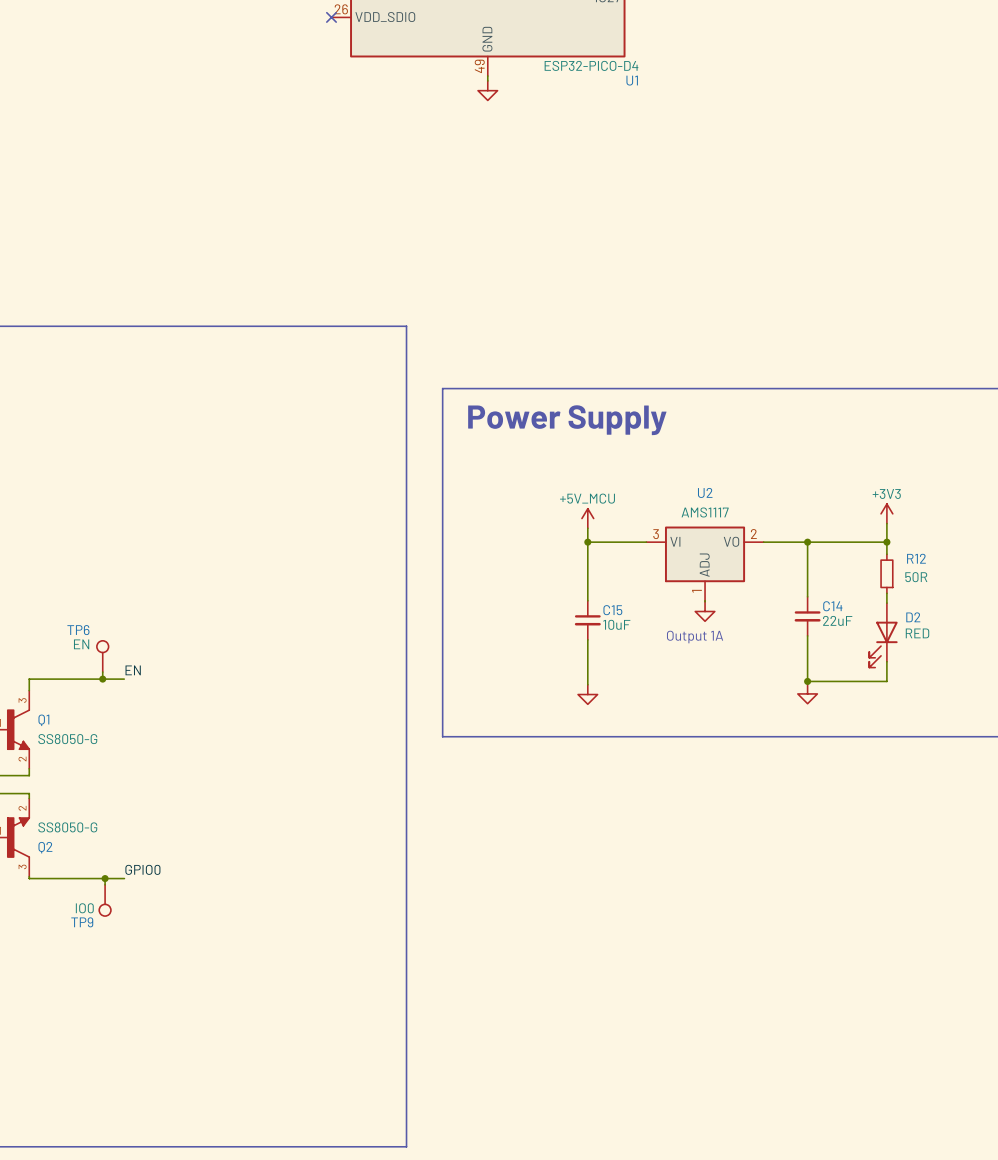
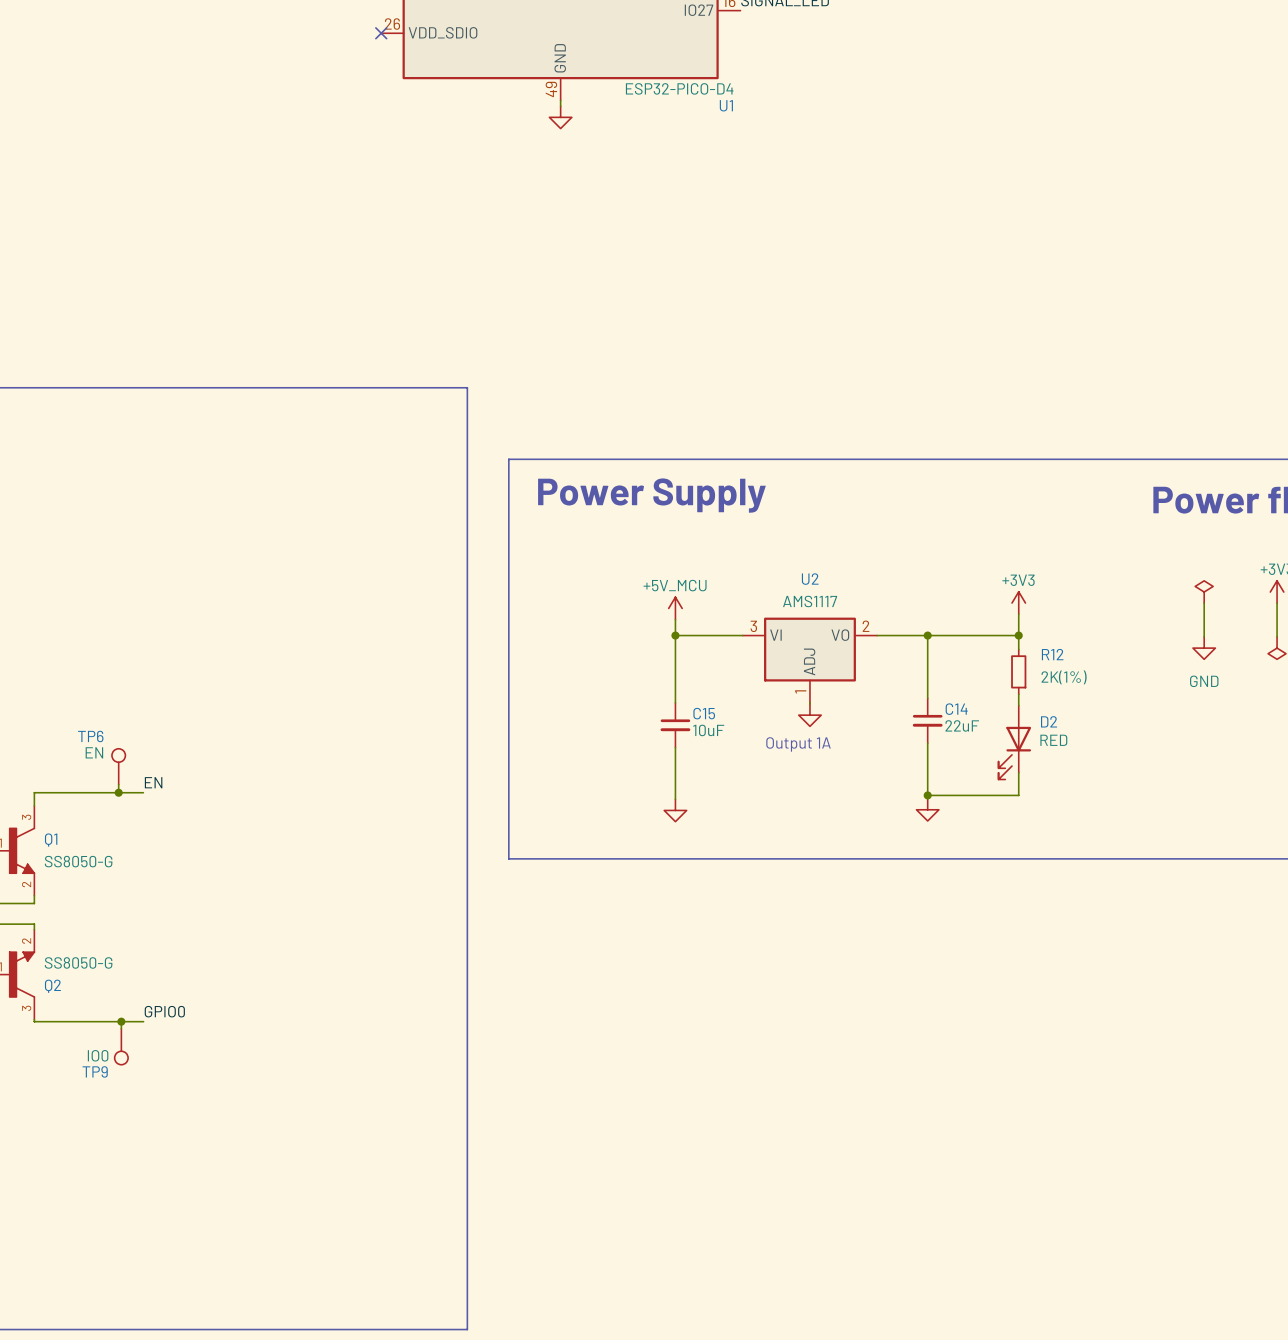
R12 value: 50R (916, 577) -> 2K(1%) (1064, 677)

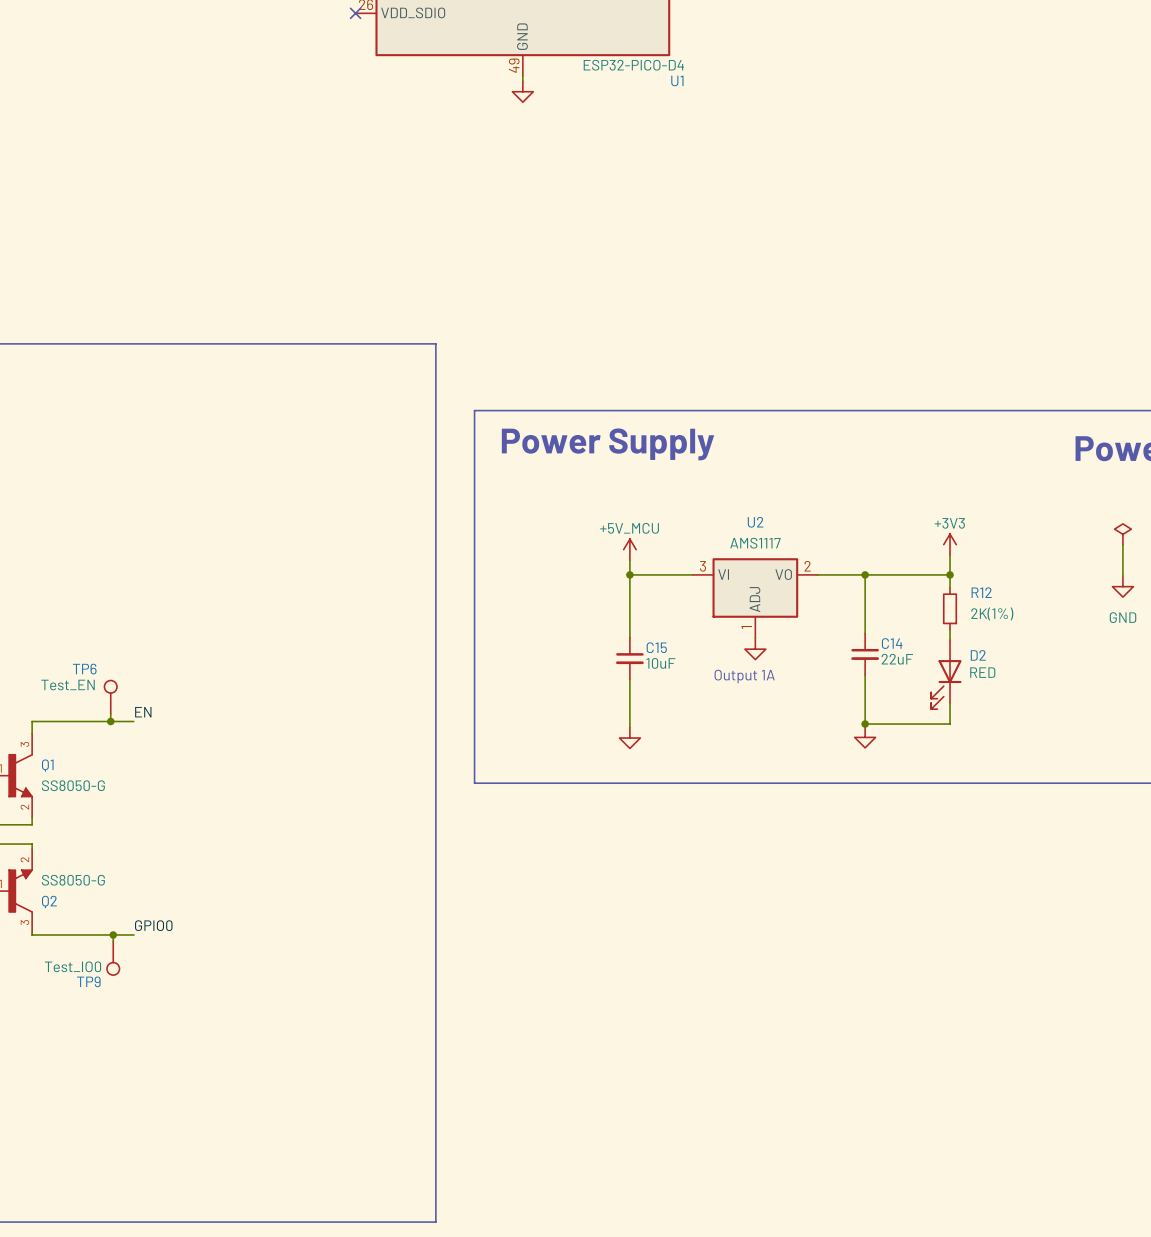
TP6 value: EN (94, 752) -> Test_EN (68, 685)
TP9 value: IO0 (98, 1055) -> Test_IO0 (73, 966)

